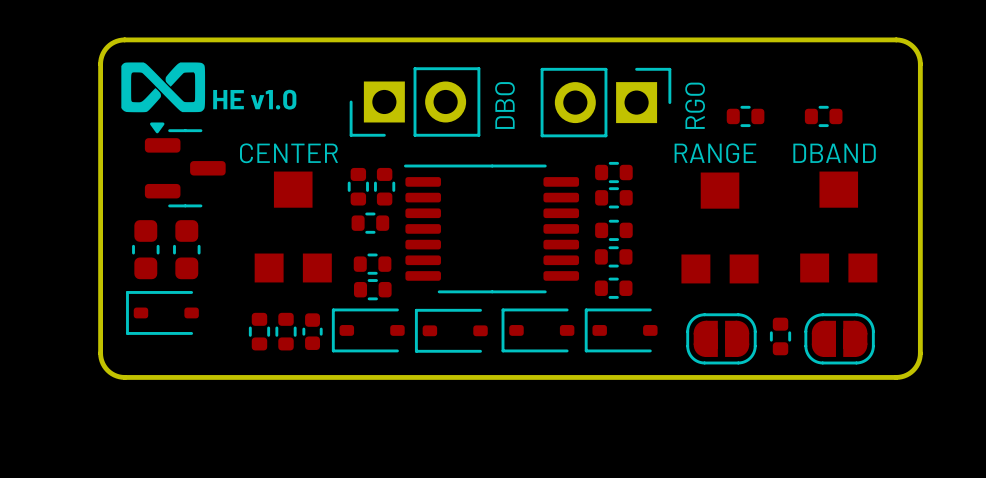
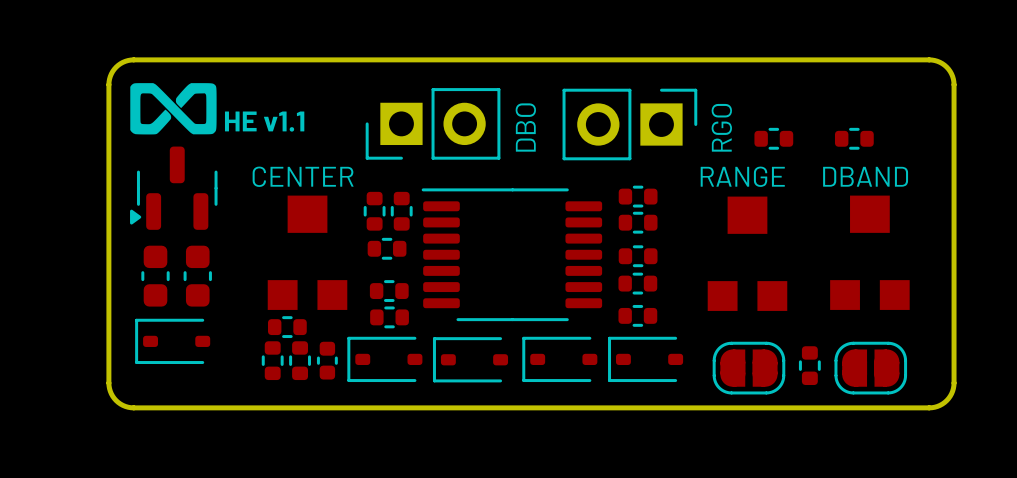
text: HE v1.0 (254, 99) -> HE v1.1 (264, 121)
part rotation: 0° (185, 164) -> 90° counterclockwise (173, 188)
part: none -> (287, 327)

